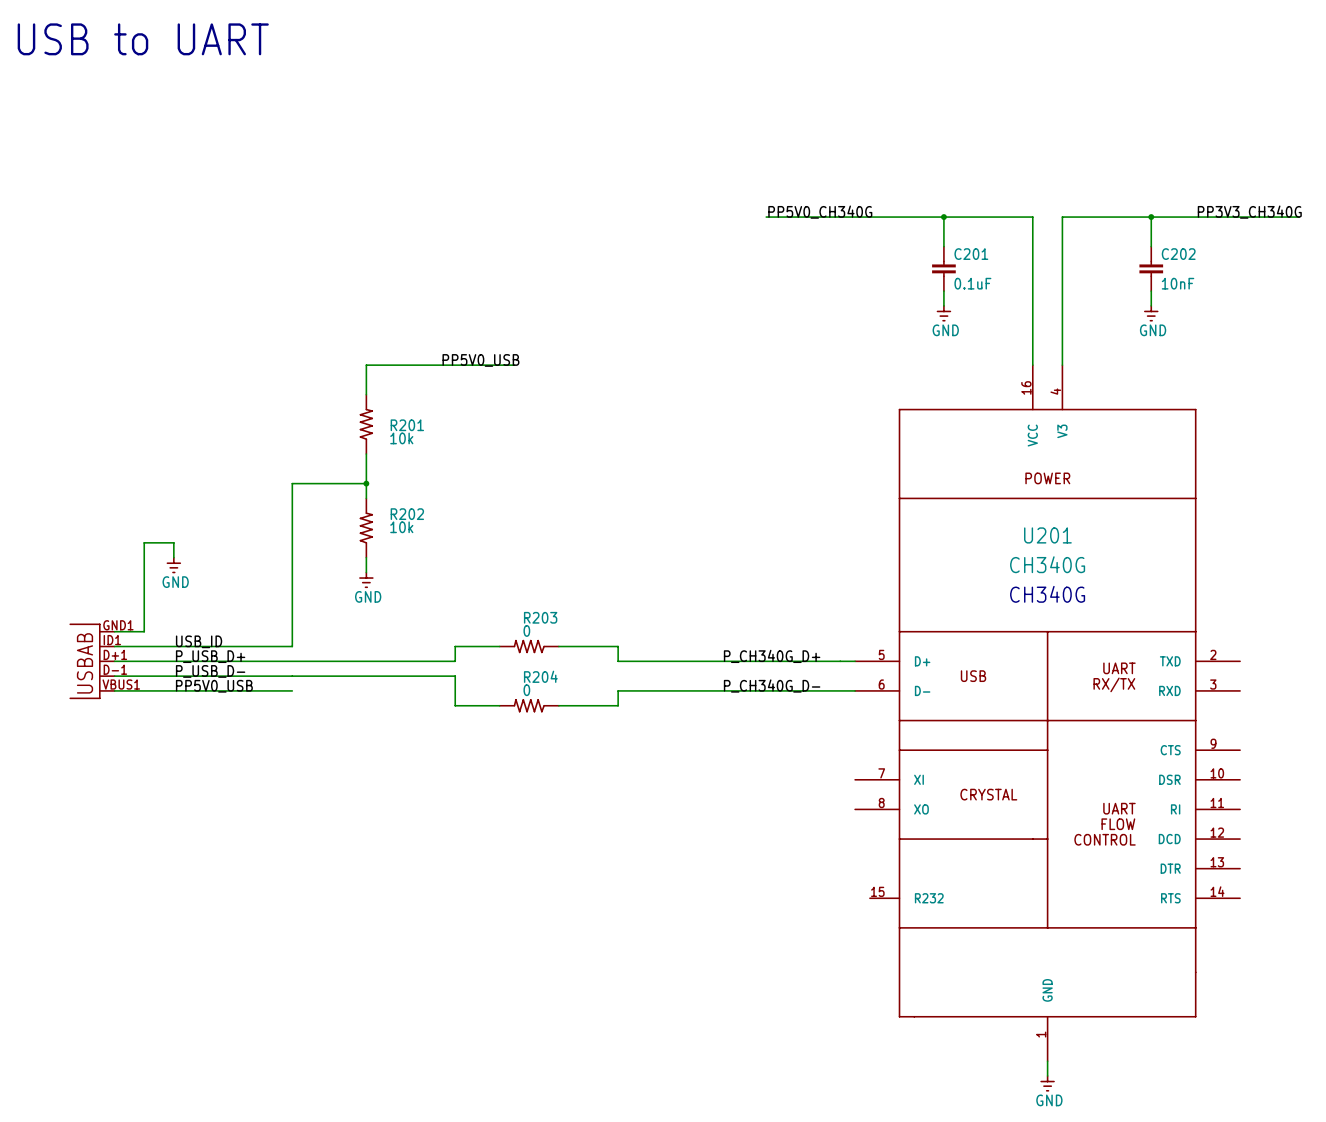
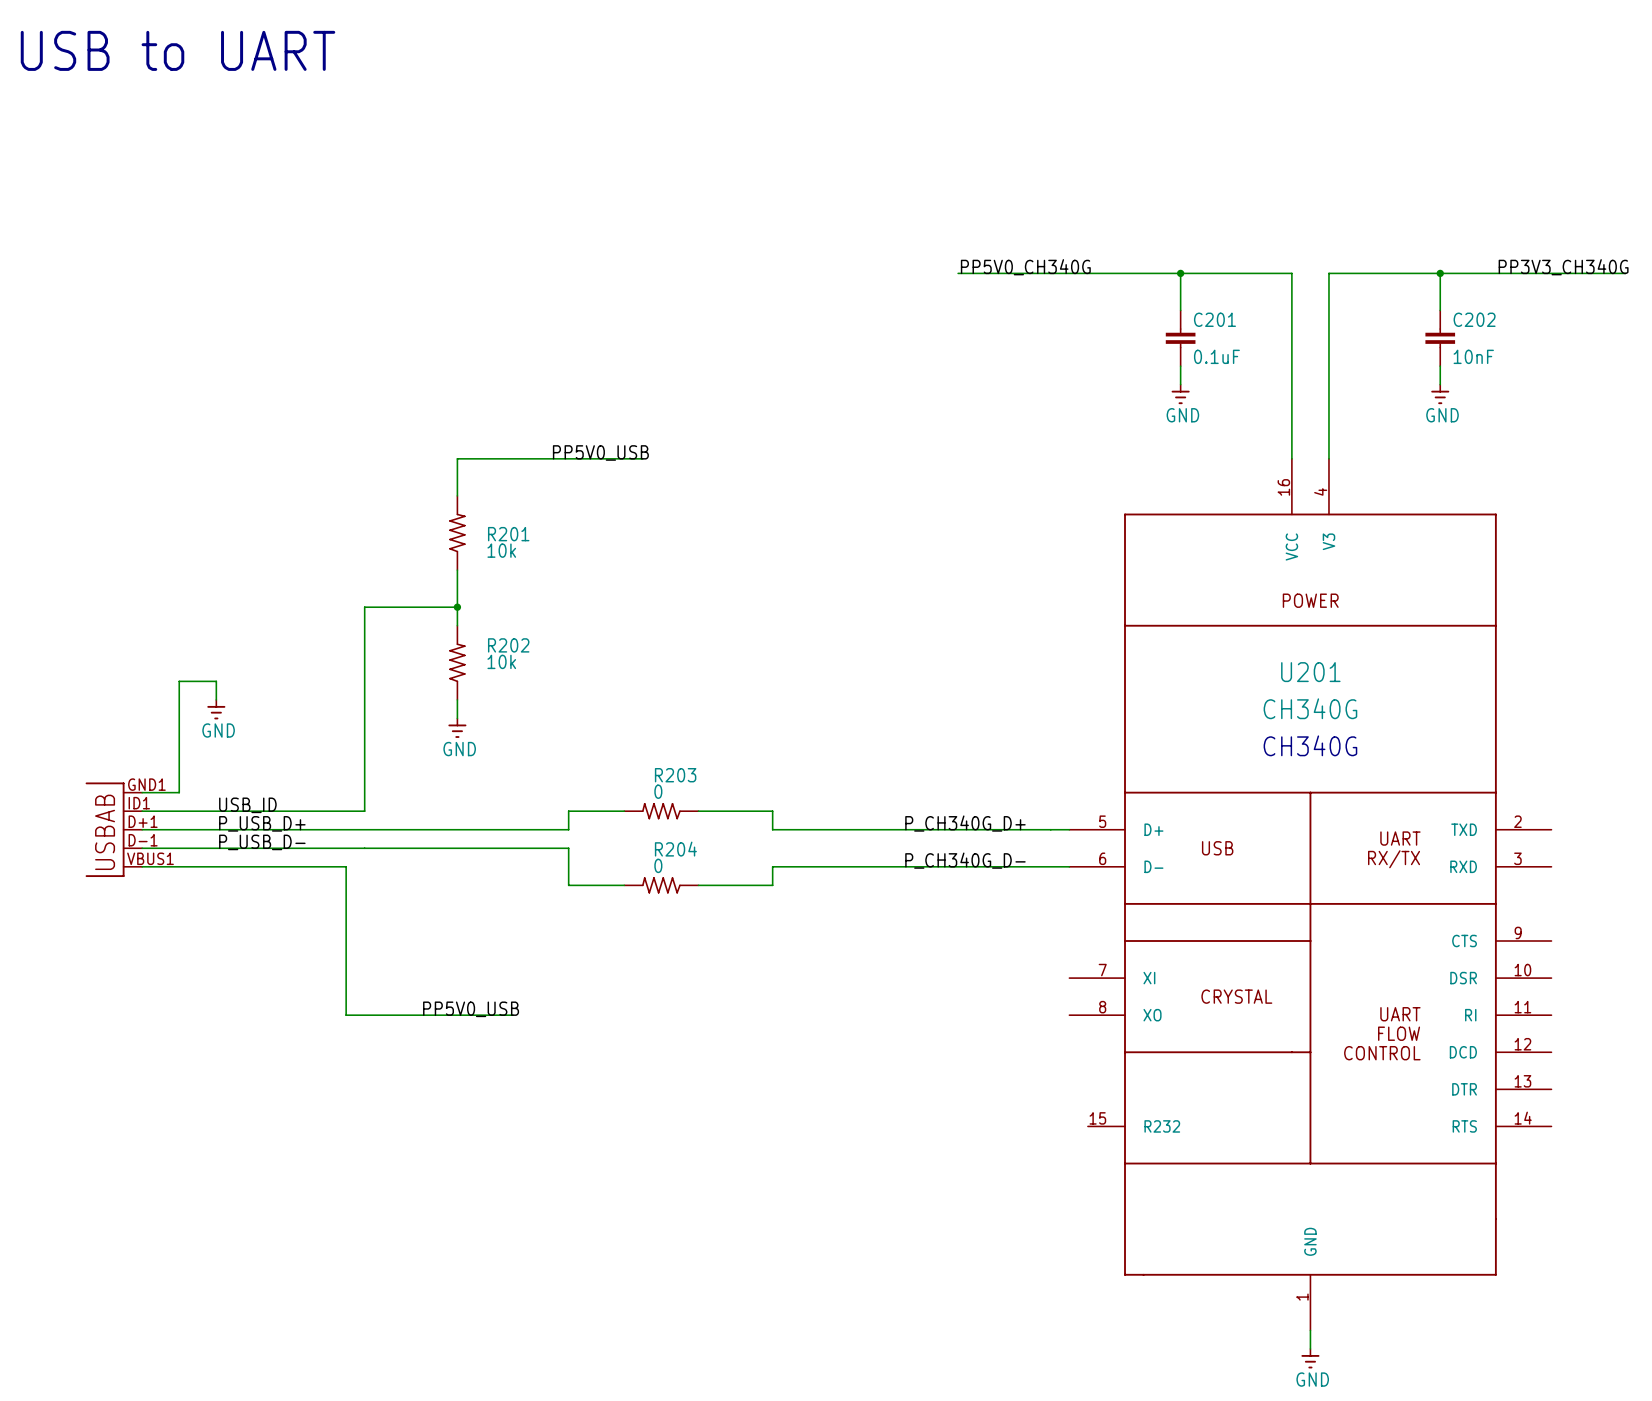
label: PP5V0_USB (214, 686) -> none
wire: (277, 690) (292, 690) -> (346, 866) (346, 1015) (513, 1015)
label: none -> PP5V0_USB (471, 1009)

